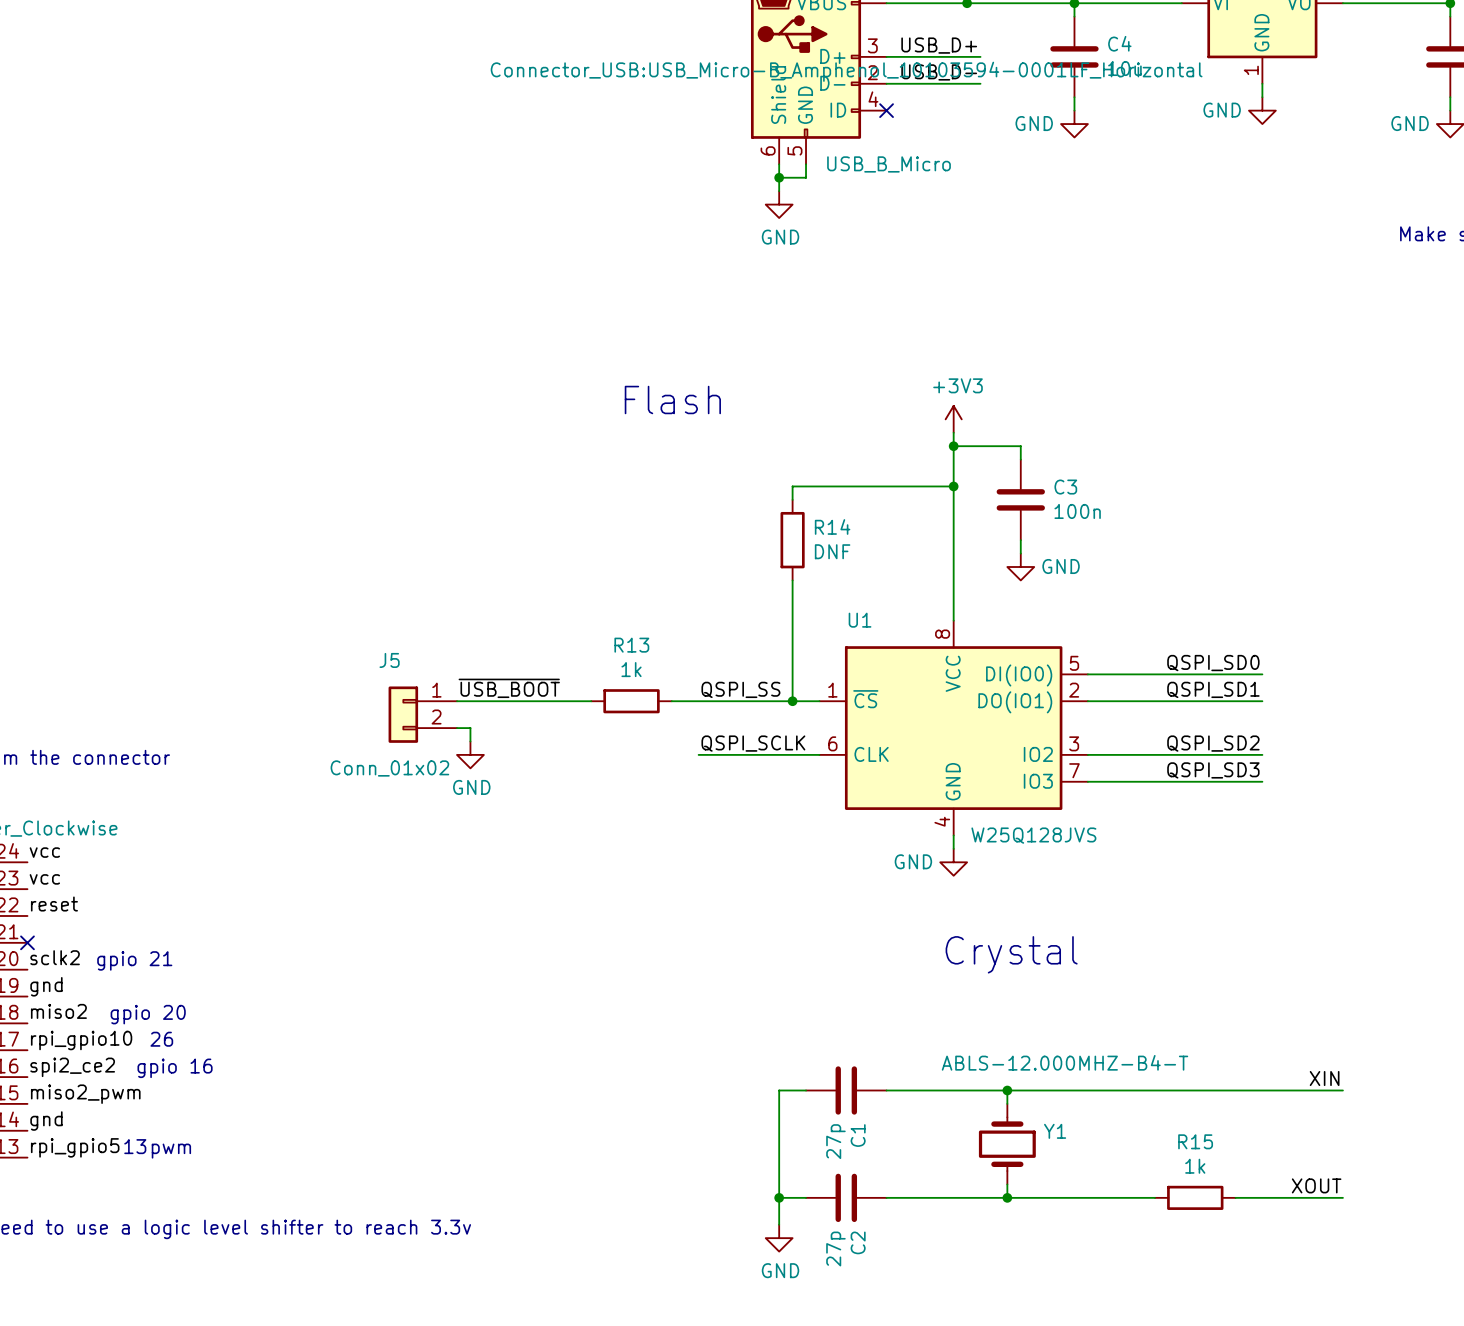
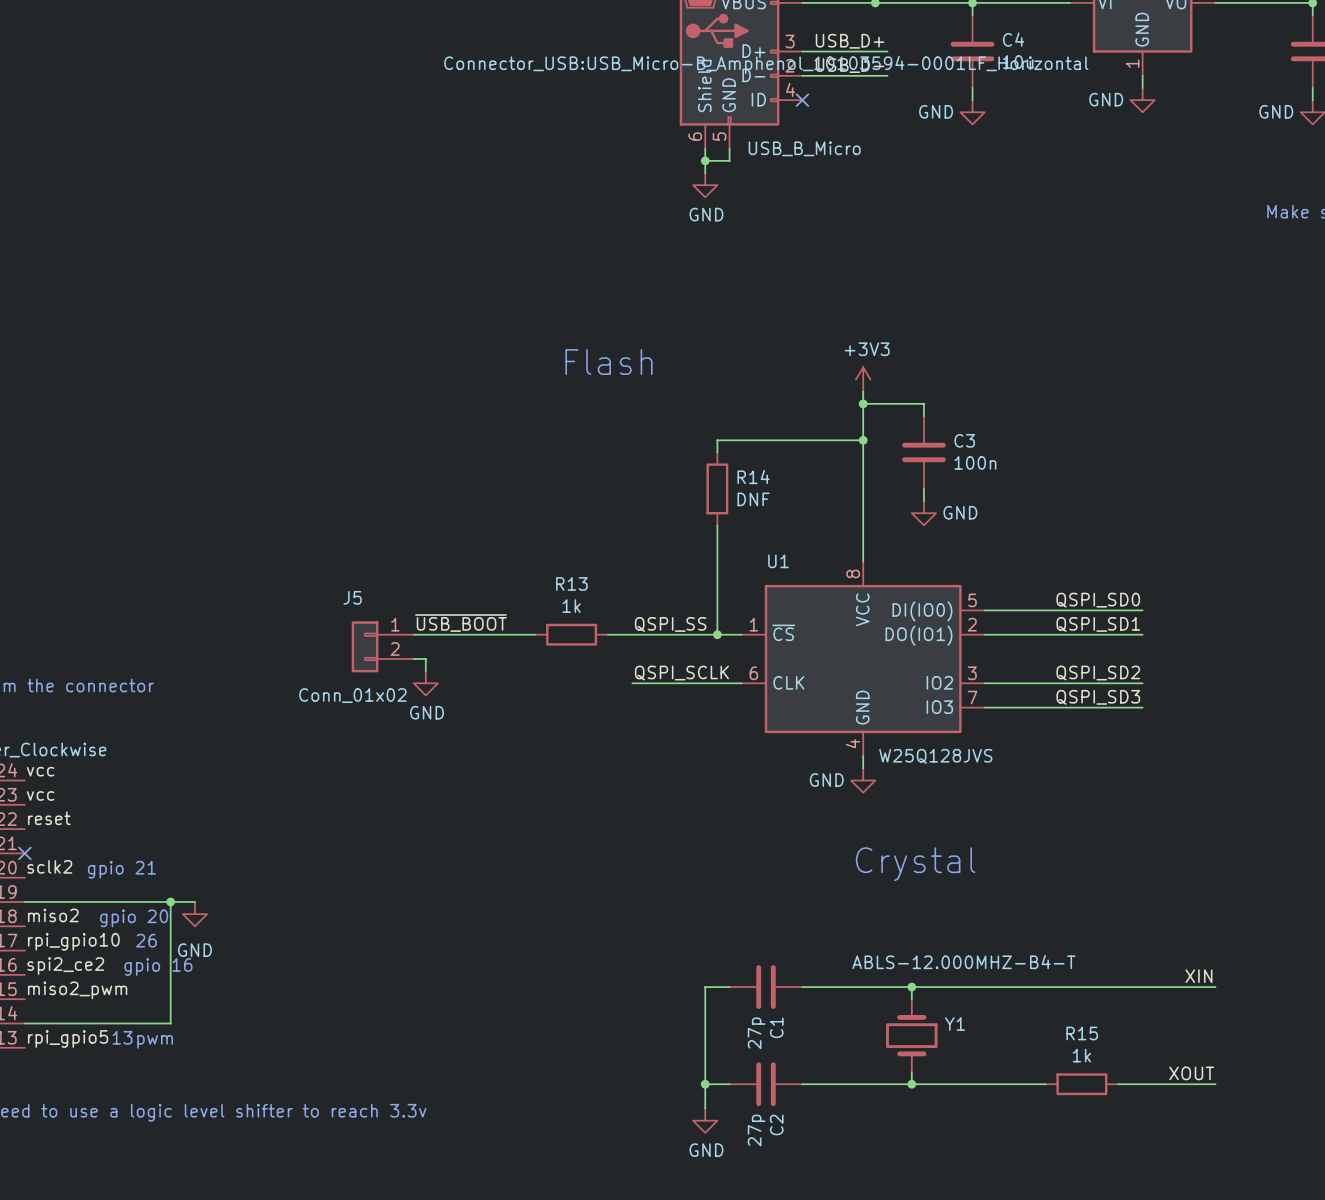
label: gnd (46, 986) -> none
wire: none -> (24, 902) (194, 902)
wire: none -> (170, 902) (170, 1023) (24, 1023)
junction: none -> (170, 902)
power symbol: none -> GND (194, 914)
label: gnd (46, 1121) -> none

